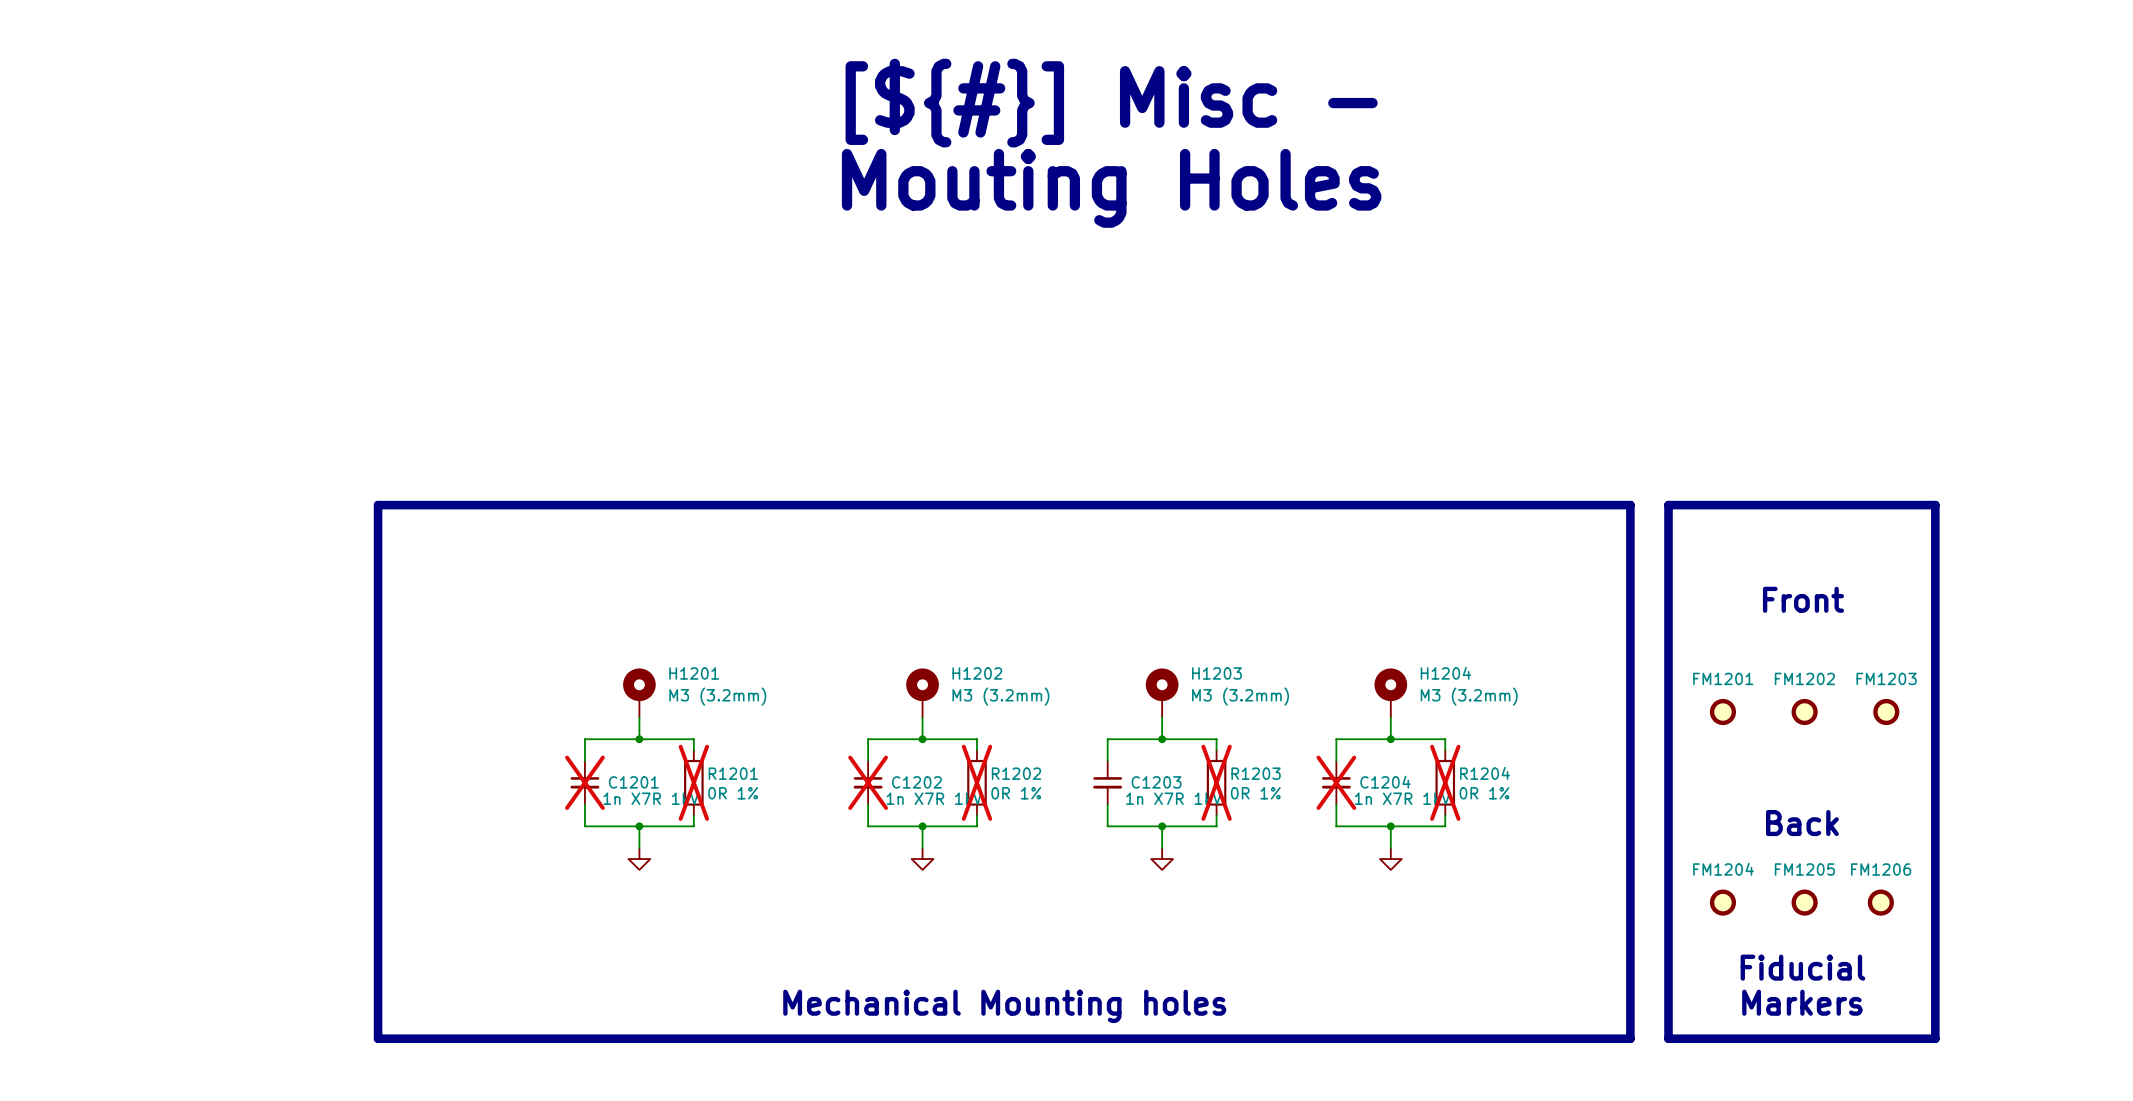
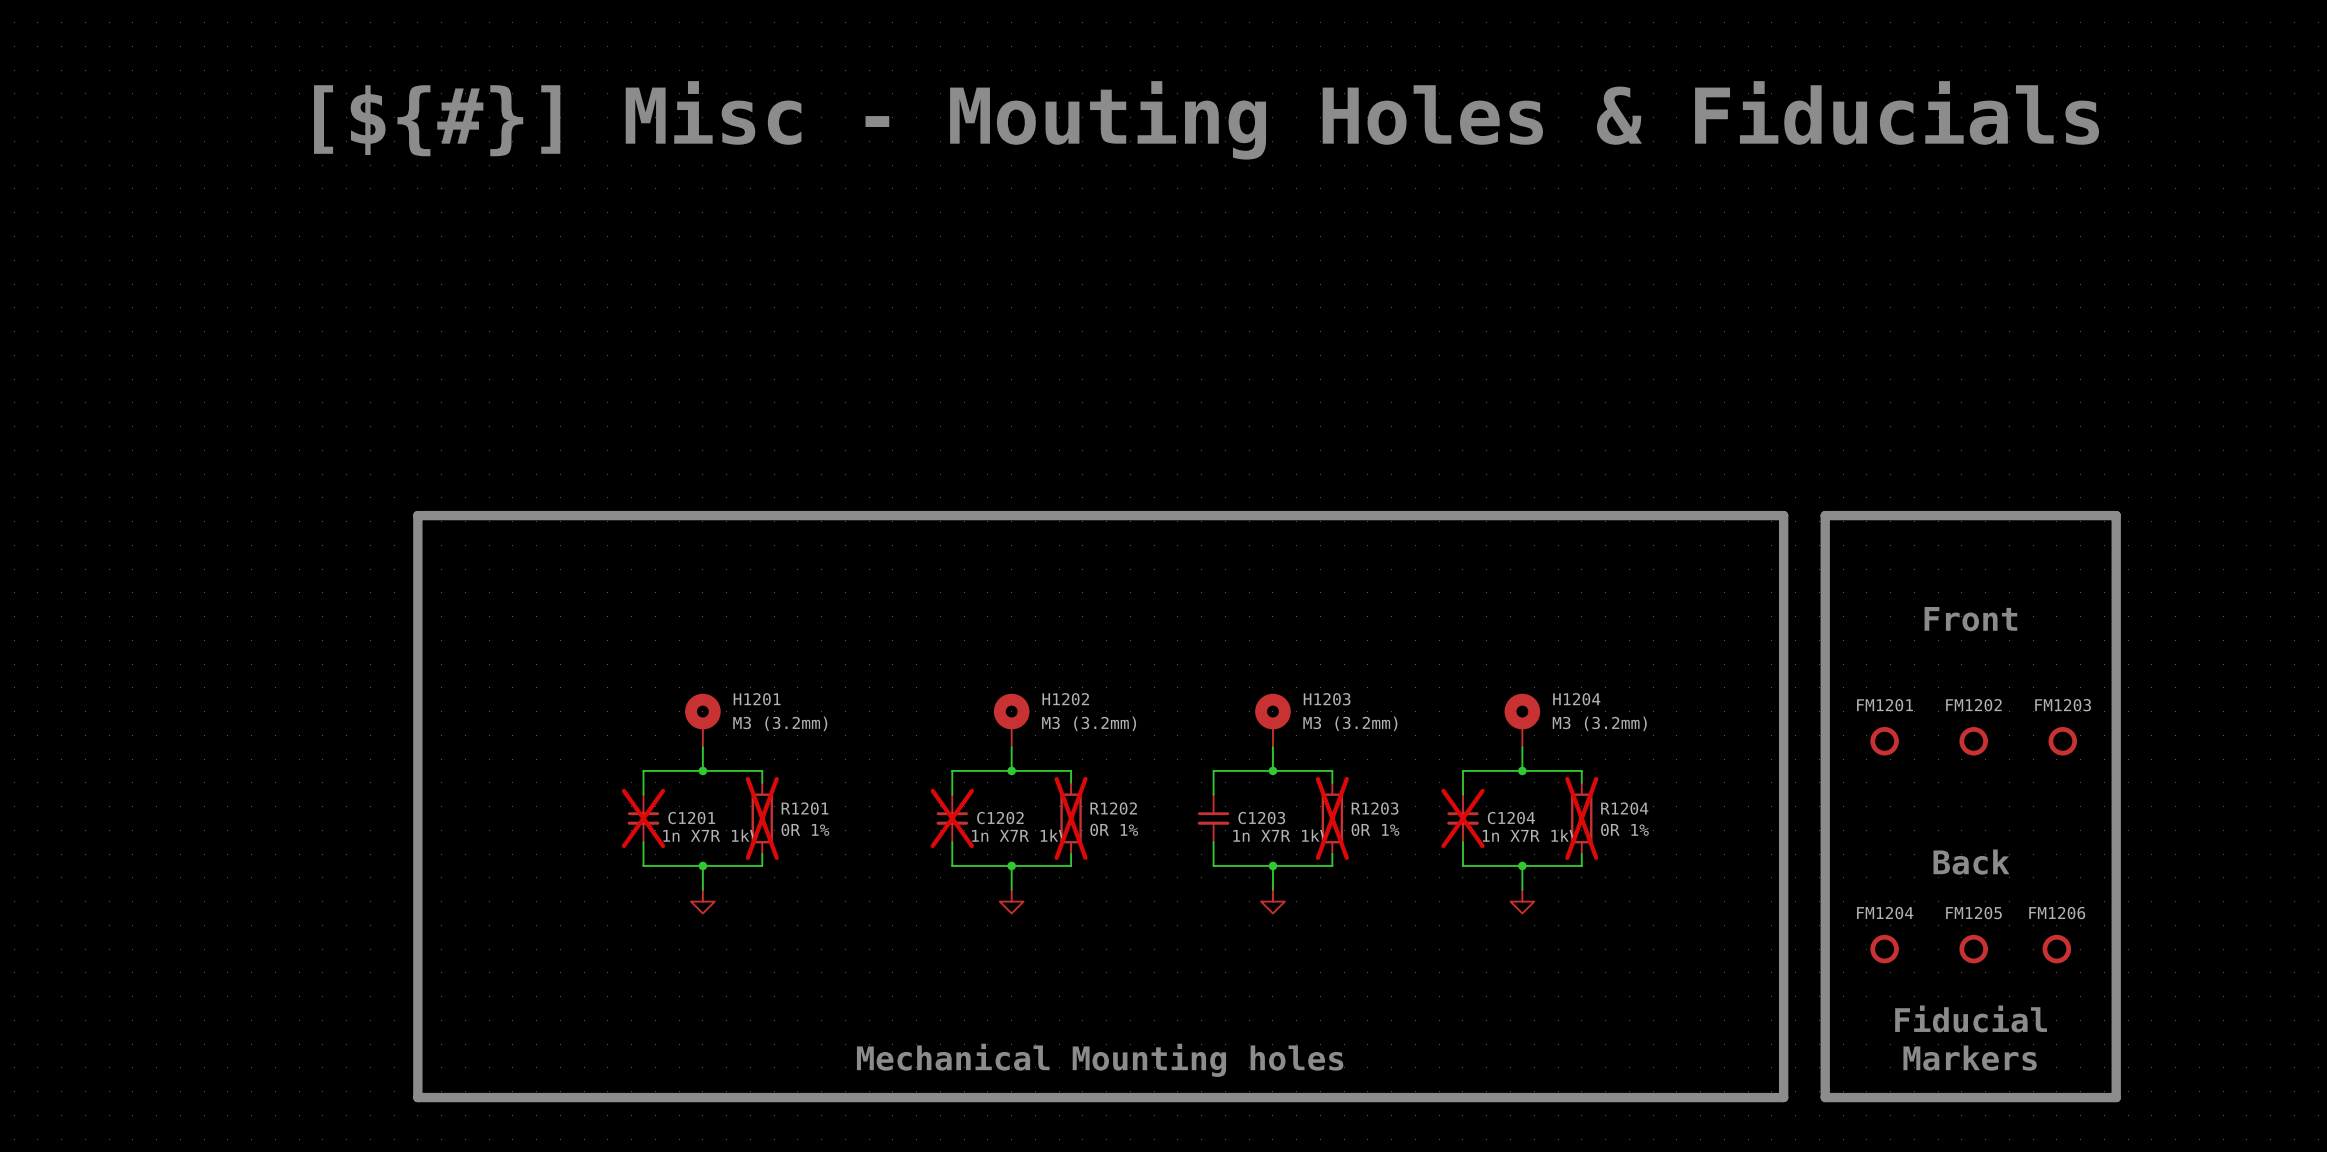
text: [${#}] Misc - (1111, 103) -> none
text: none -> [${#}] Misc - Mouting Holes & Fiducials (1206, 120)
text: Mouting Holes (1111, 188) -> none

